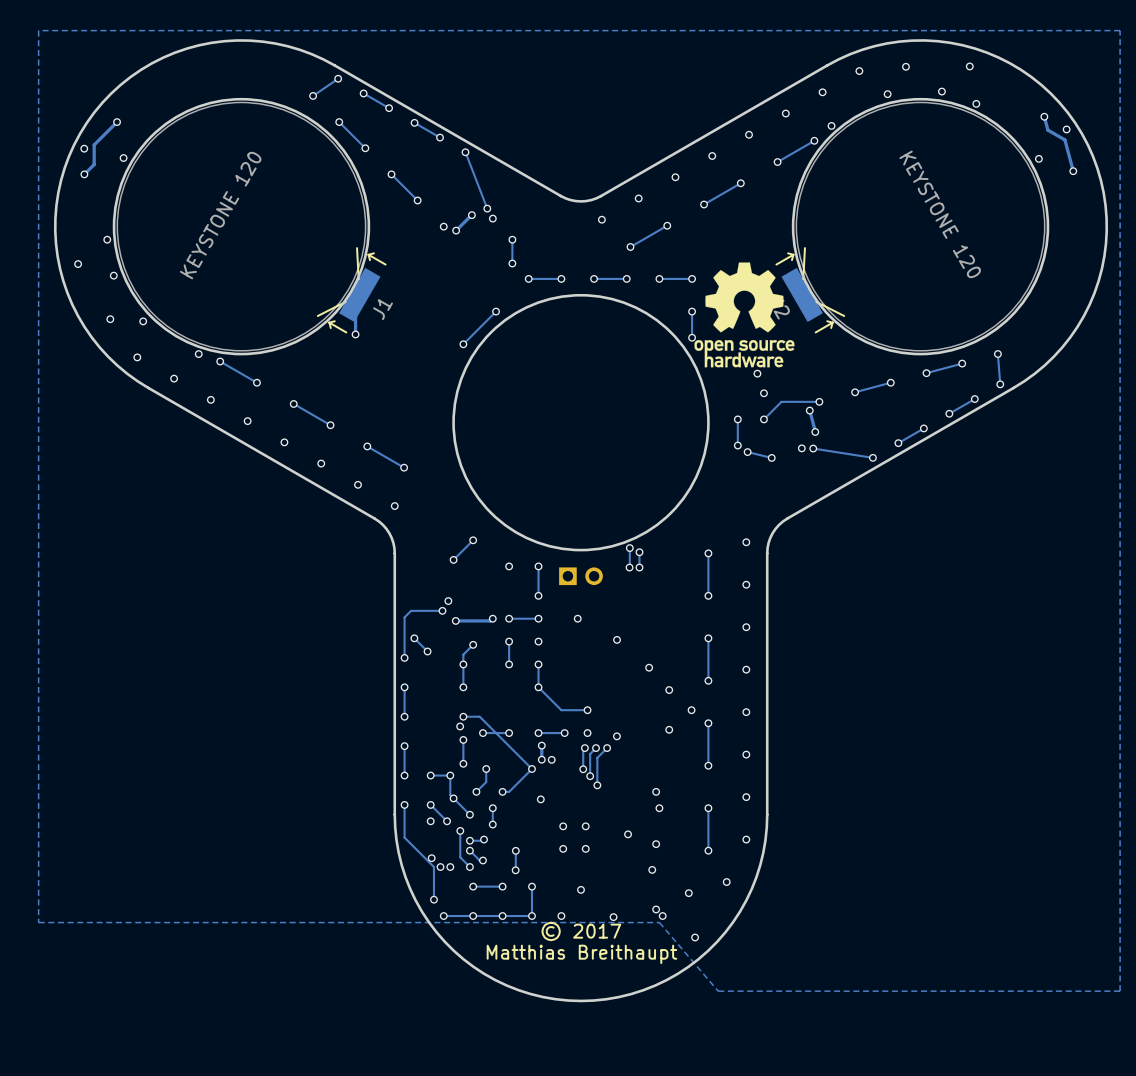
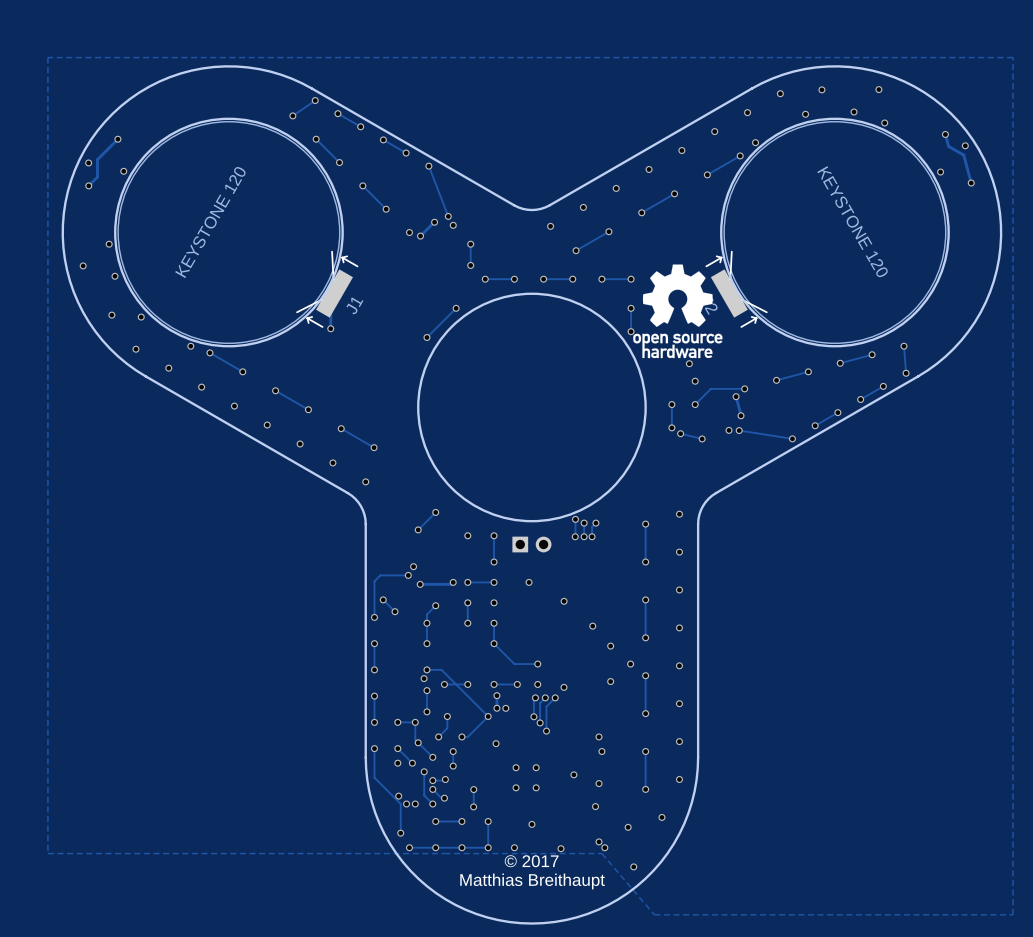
track: none -> (595, 523) (592, 526) (592, 536)
via: none -> (595, 523)
via: none -> (592, 536)

